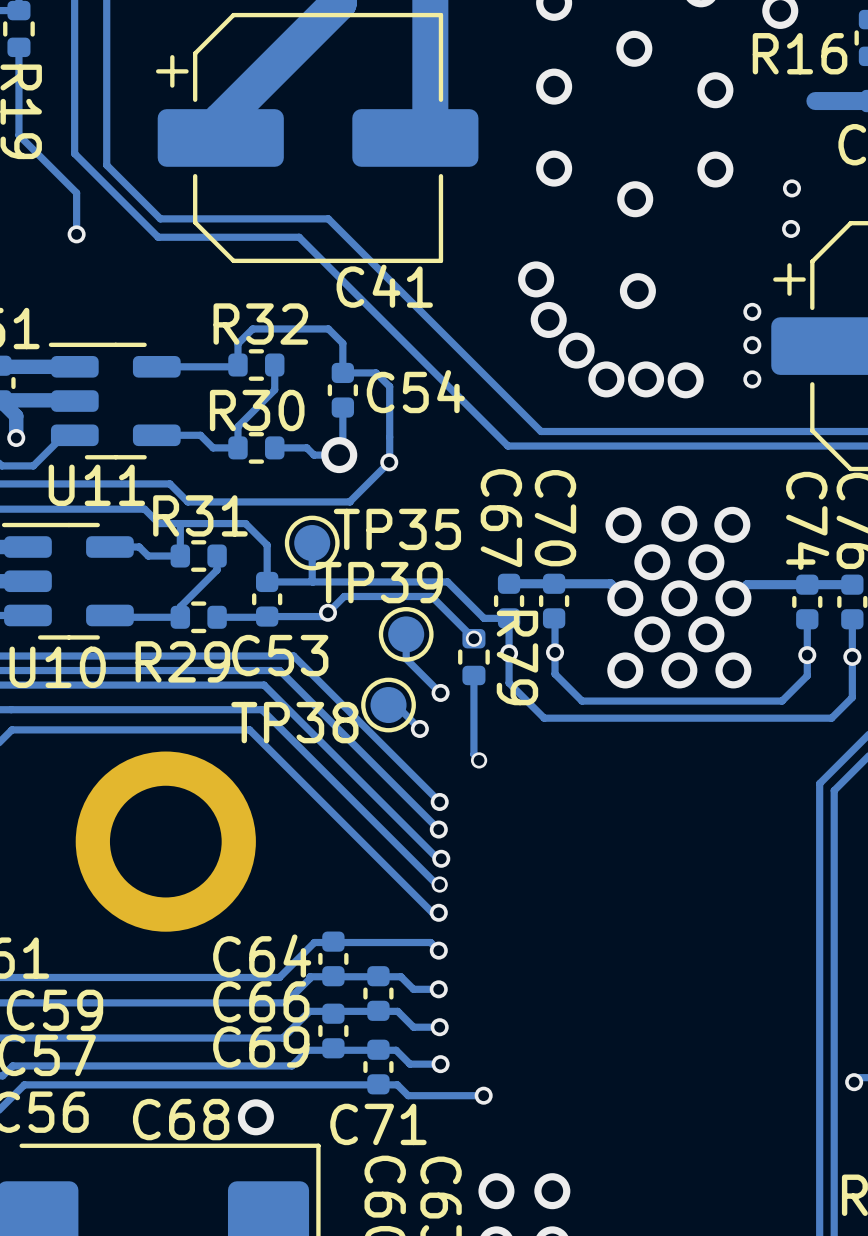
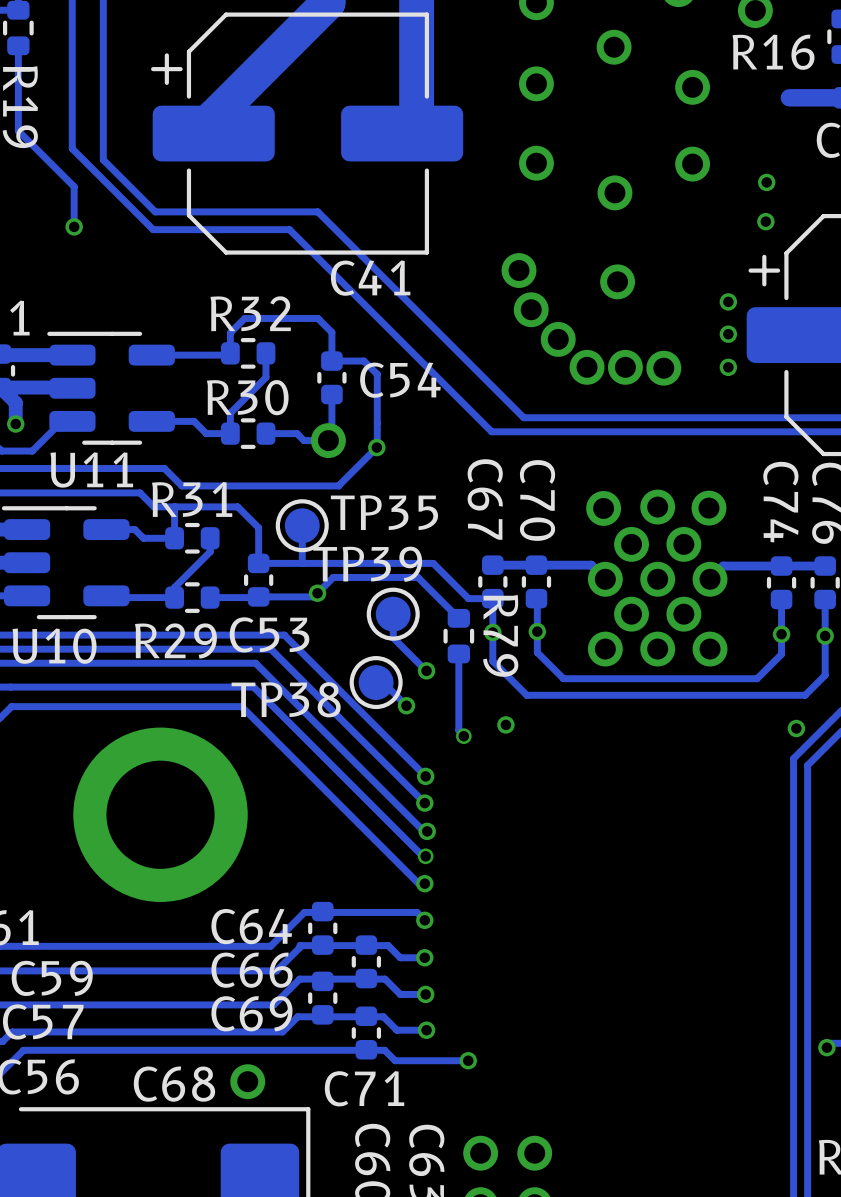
via: (473, 638) -> none
via: none -> (505, 724)
via: none -> (796, 728)

